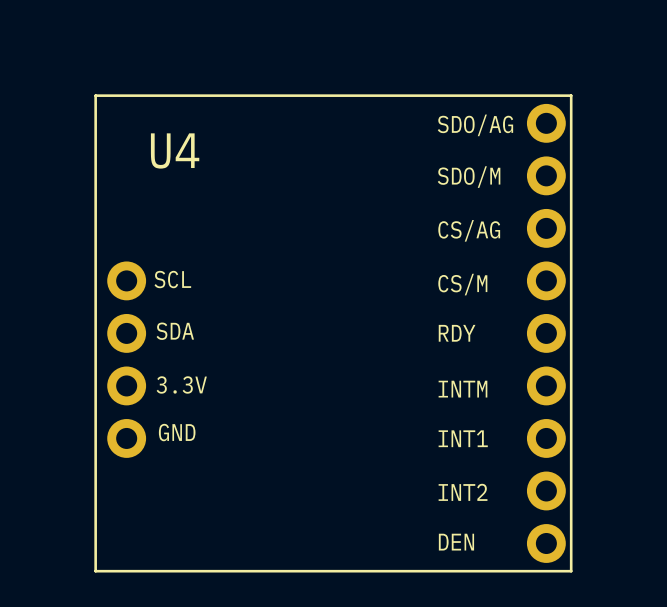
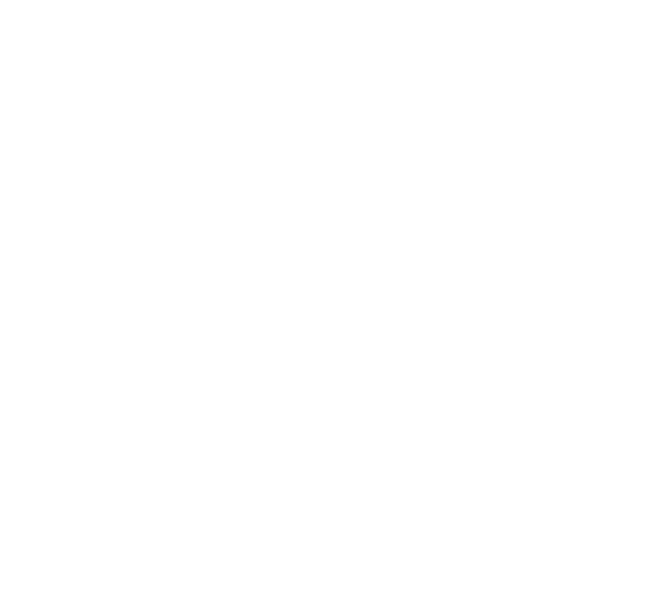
U4: (333, 333) -> none

